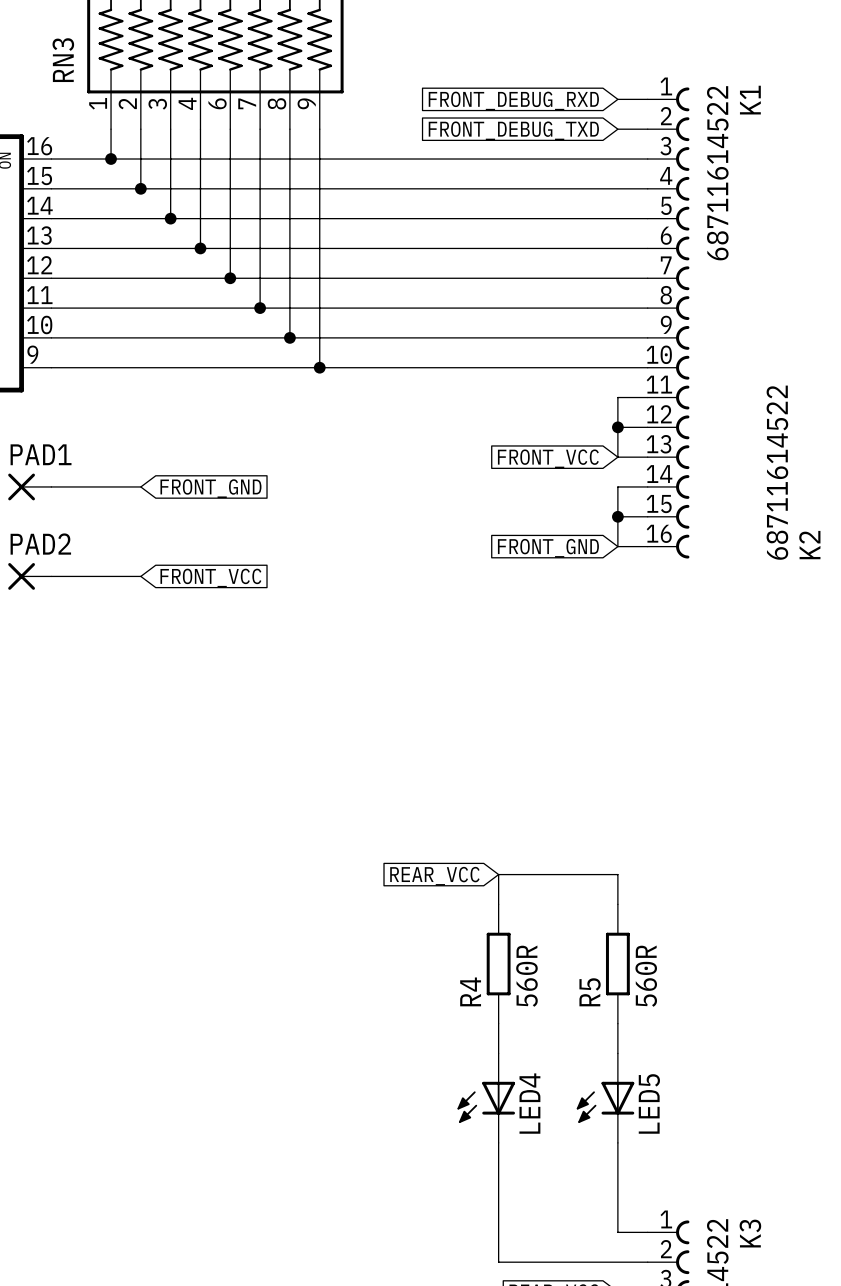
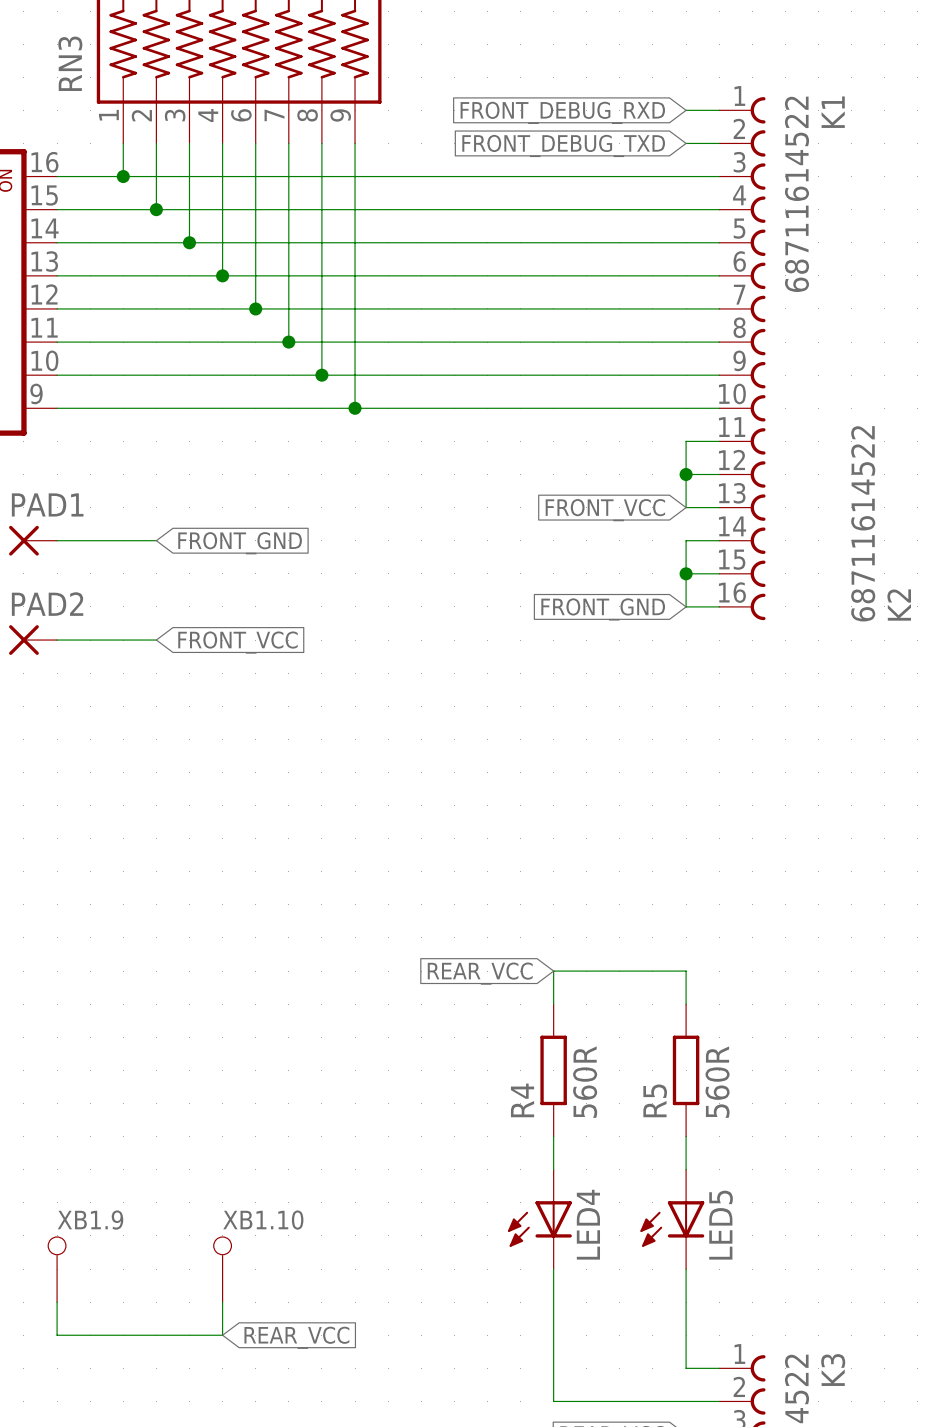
XB1.9: none -> (57, 1269)
XB1.10: none -> (222, 1269)
wire: none -> (57, 1302) (57, 1335) (222, 1335) (222, 1302)
global label: none -> REAR_VCC (296, 1337)

